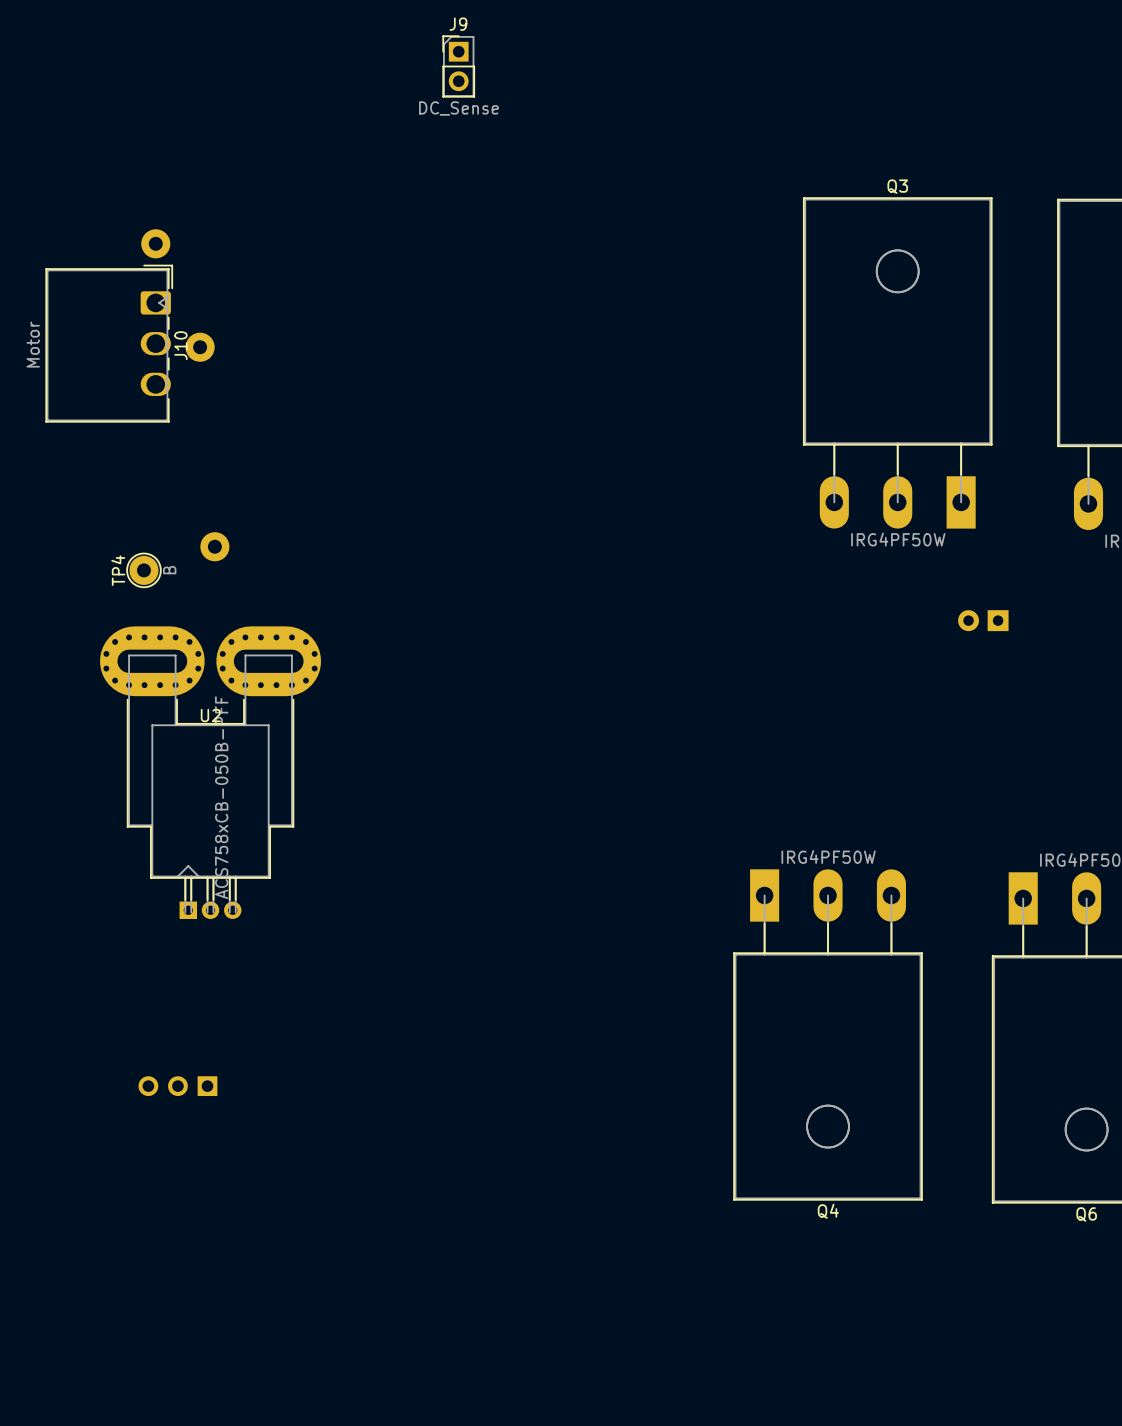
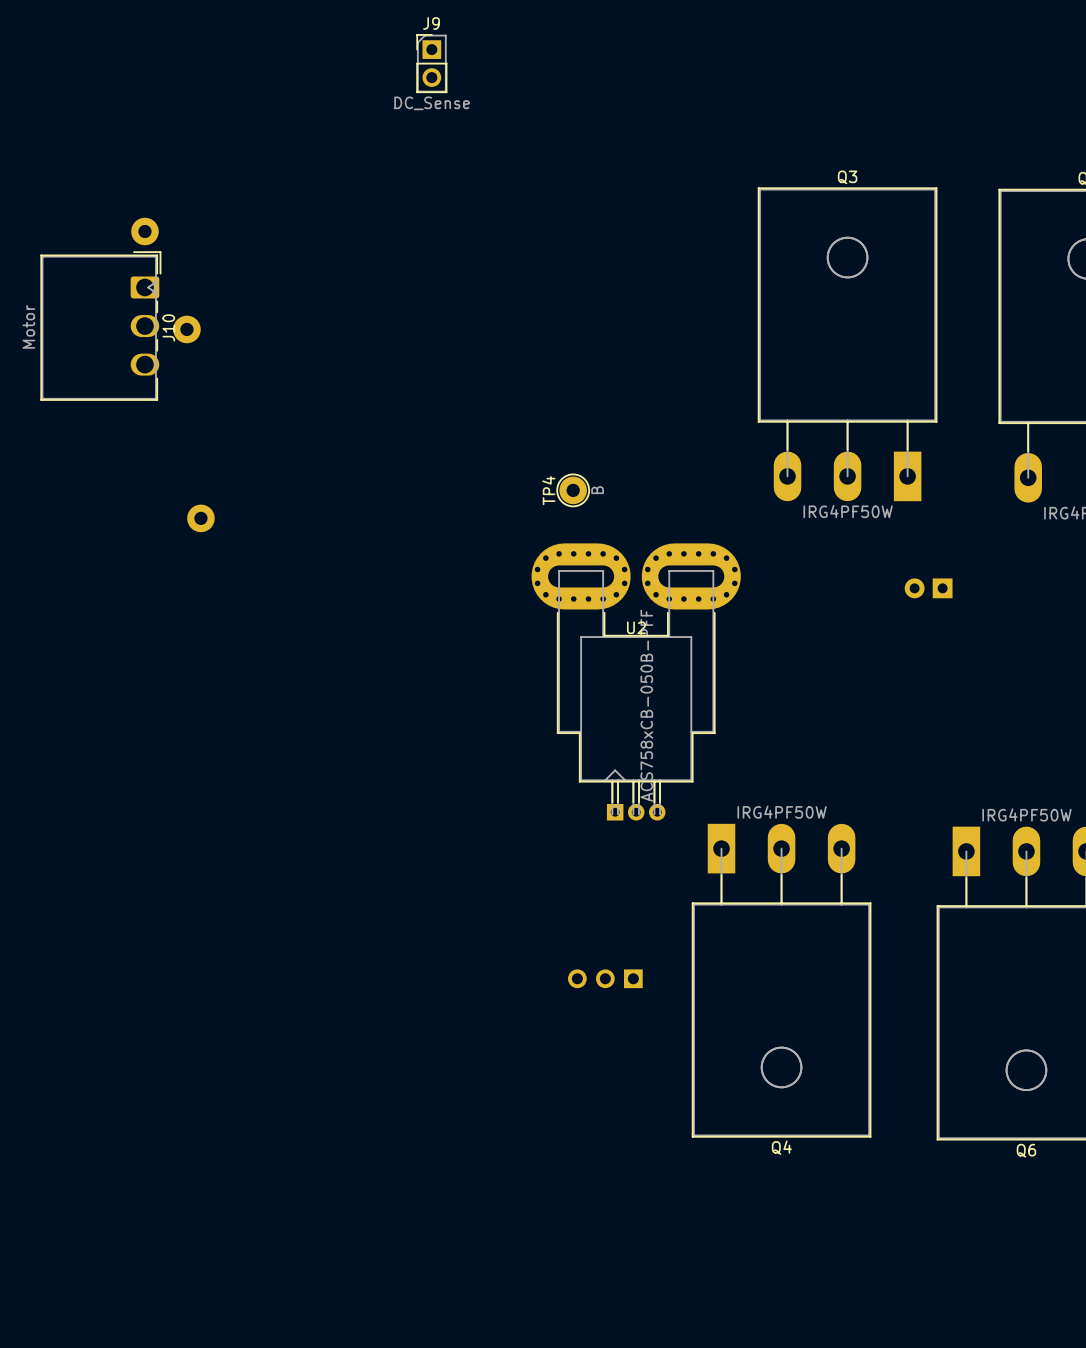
TP4 position: (143, 570) -> (573, 490)
U2 position: (210, 772) -> (636, 681)
part: none -> (605, 978)
part: (177, 1086) -> none

